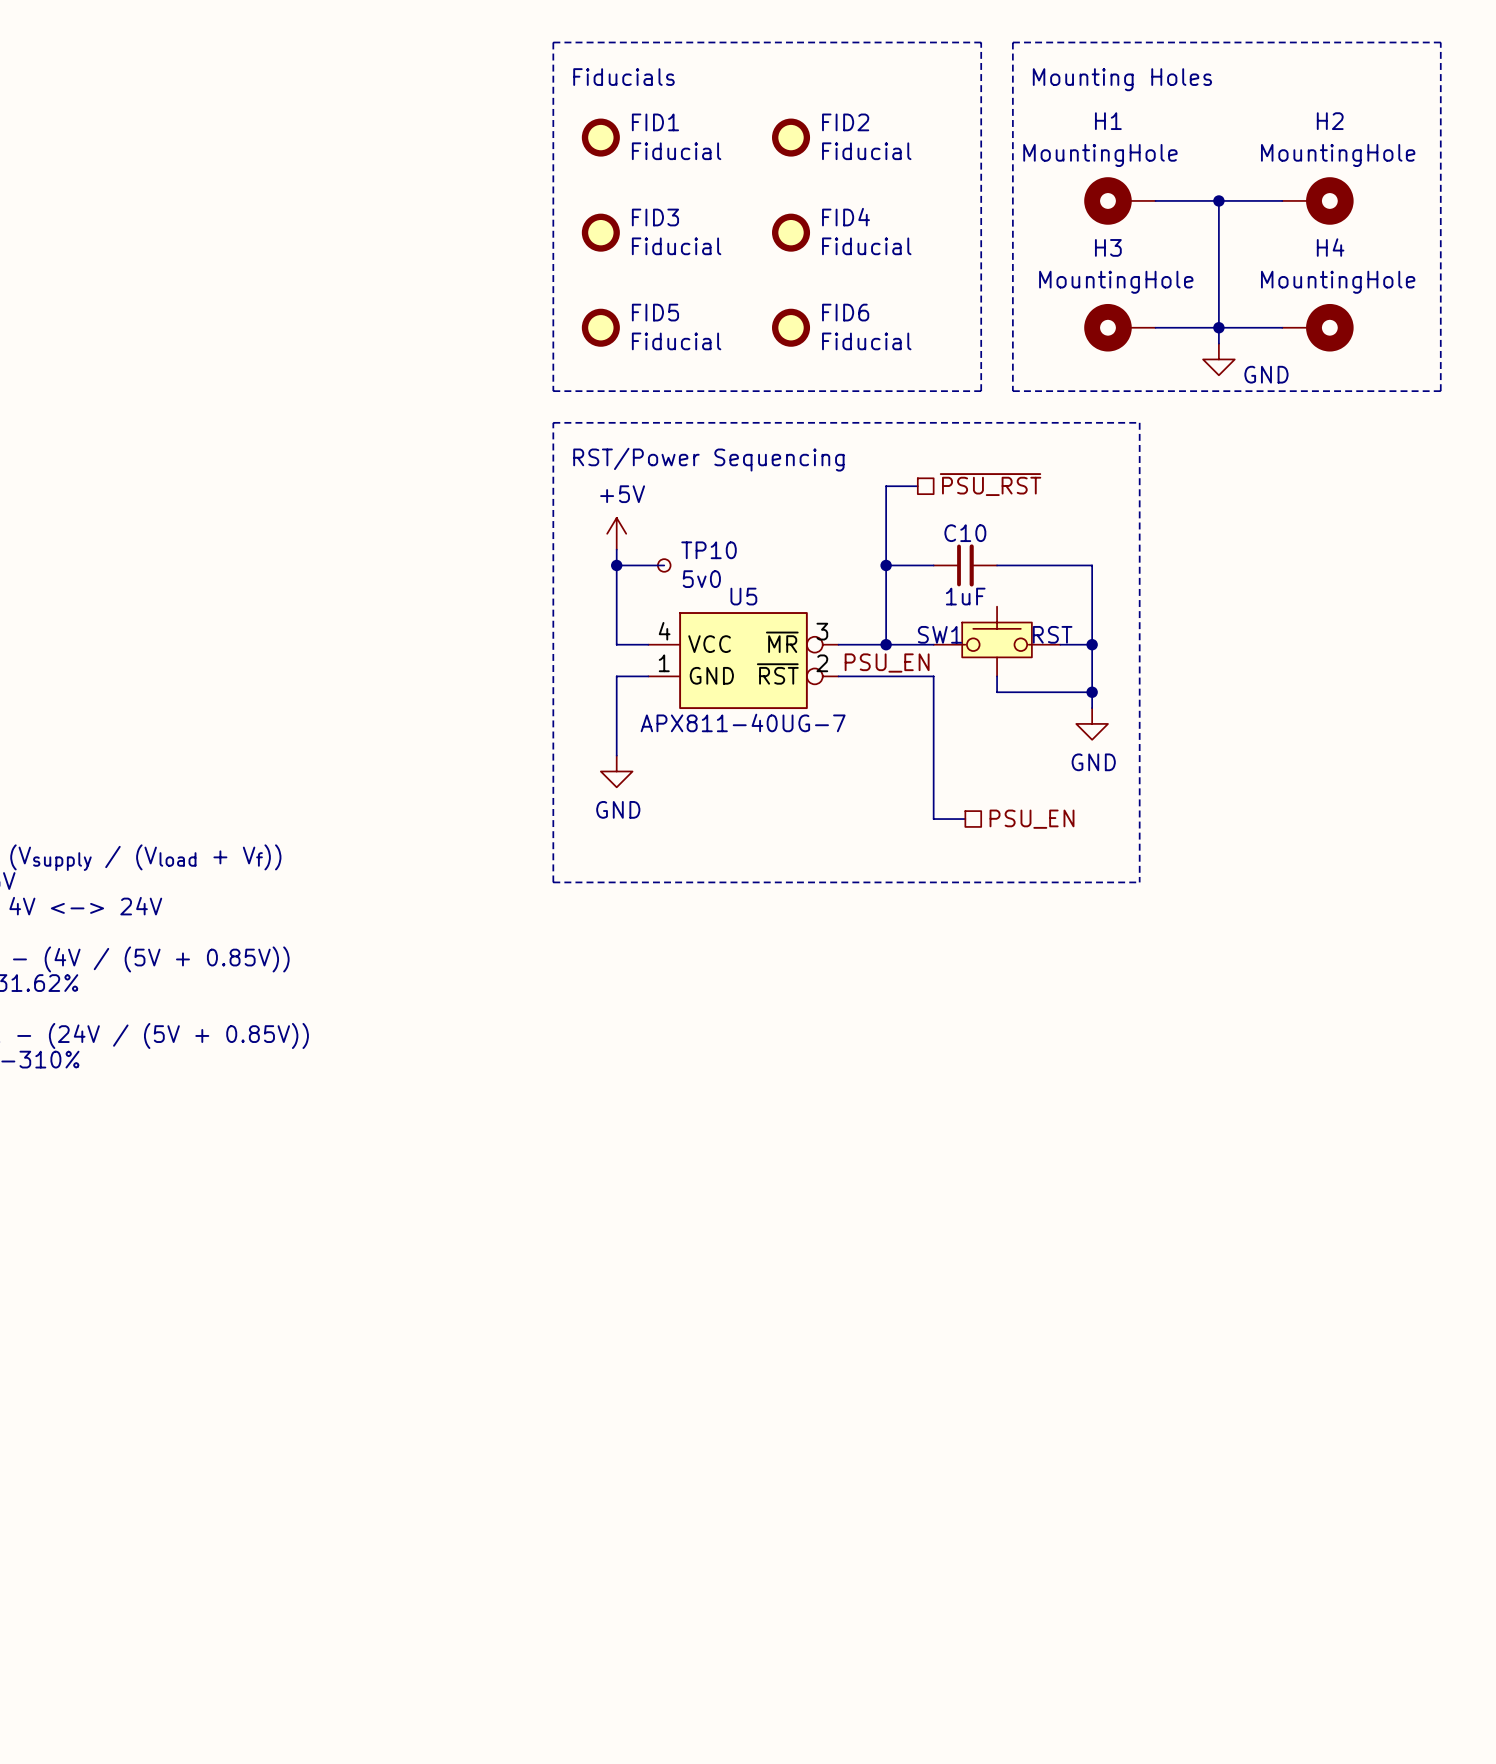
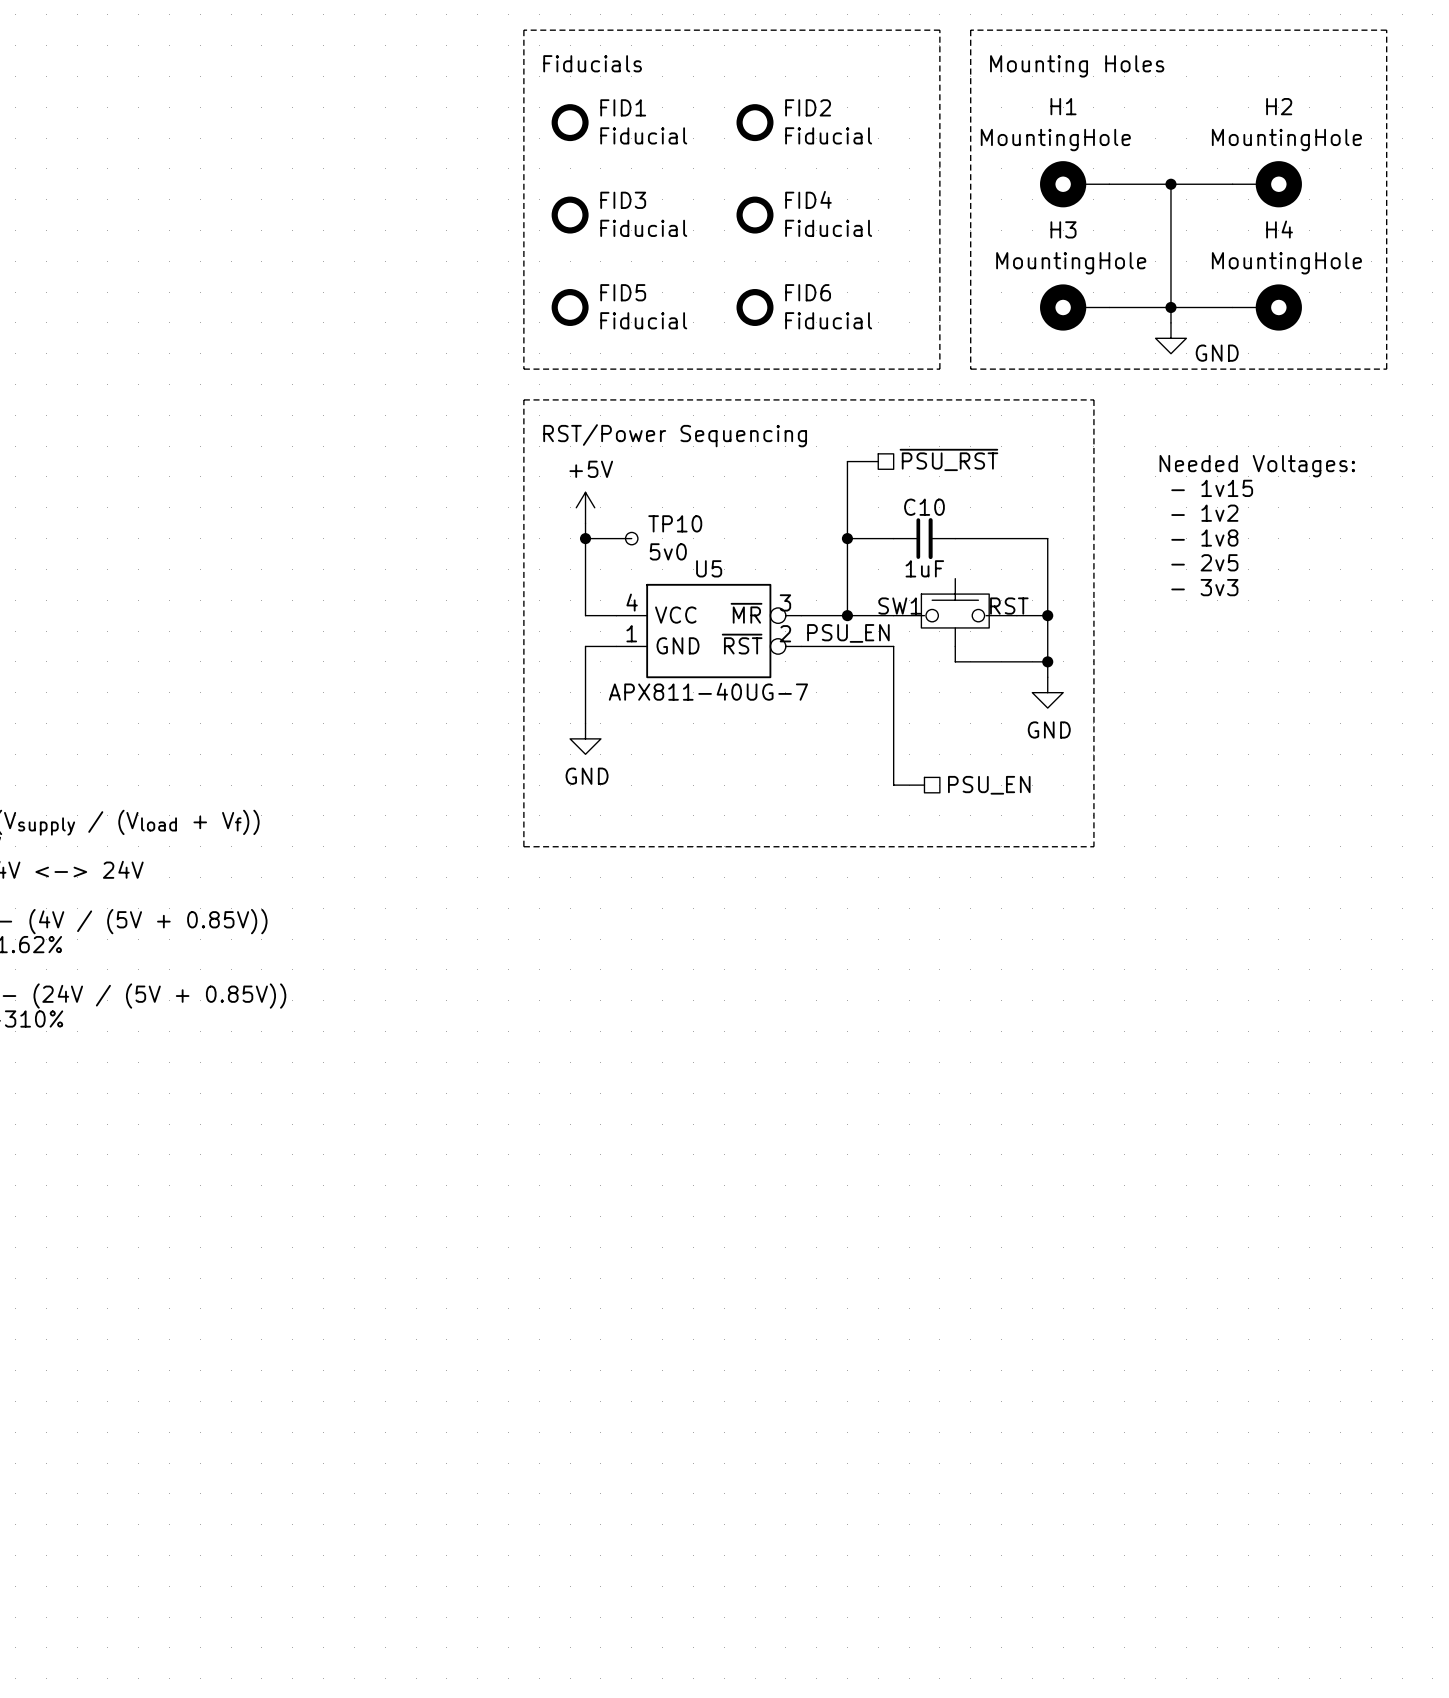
text: none -> Needed Voltages: (1257, 466)
text: none -> - 1v15 (1212, 488)
text: none -> - 1v2 (1204, 513)
text: none -> - 1v8 (1204, 537)
text: none -> - 2v5 (1204, 562)
text: none -> - 3v3 (1204, 587)

